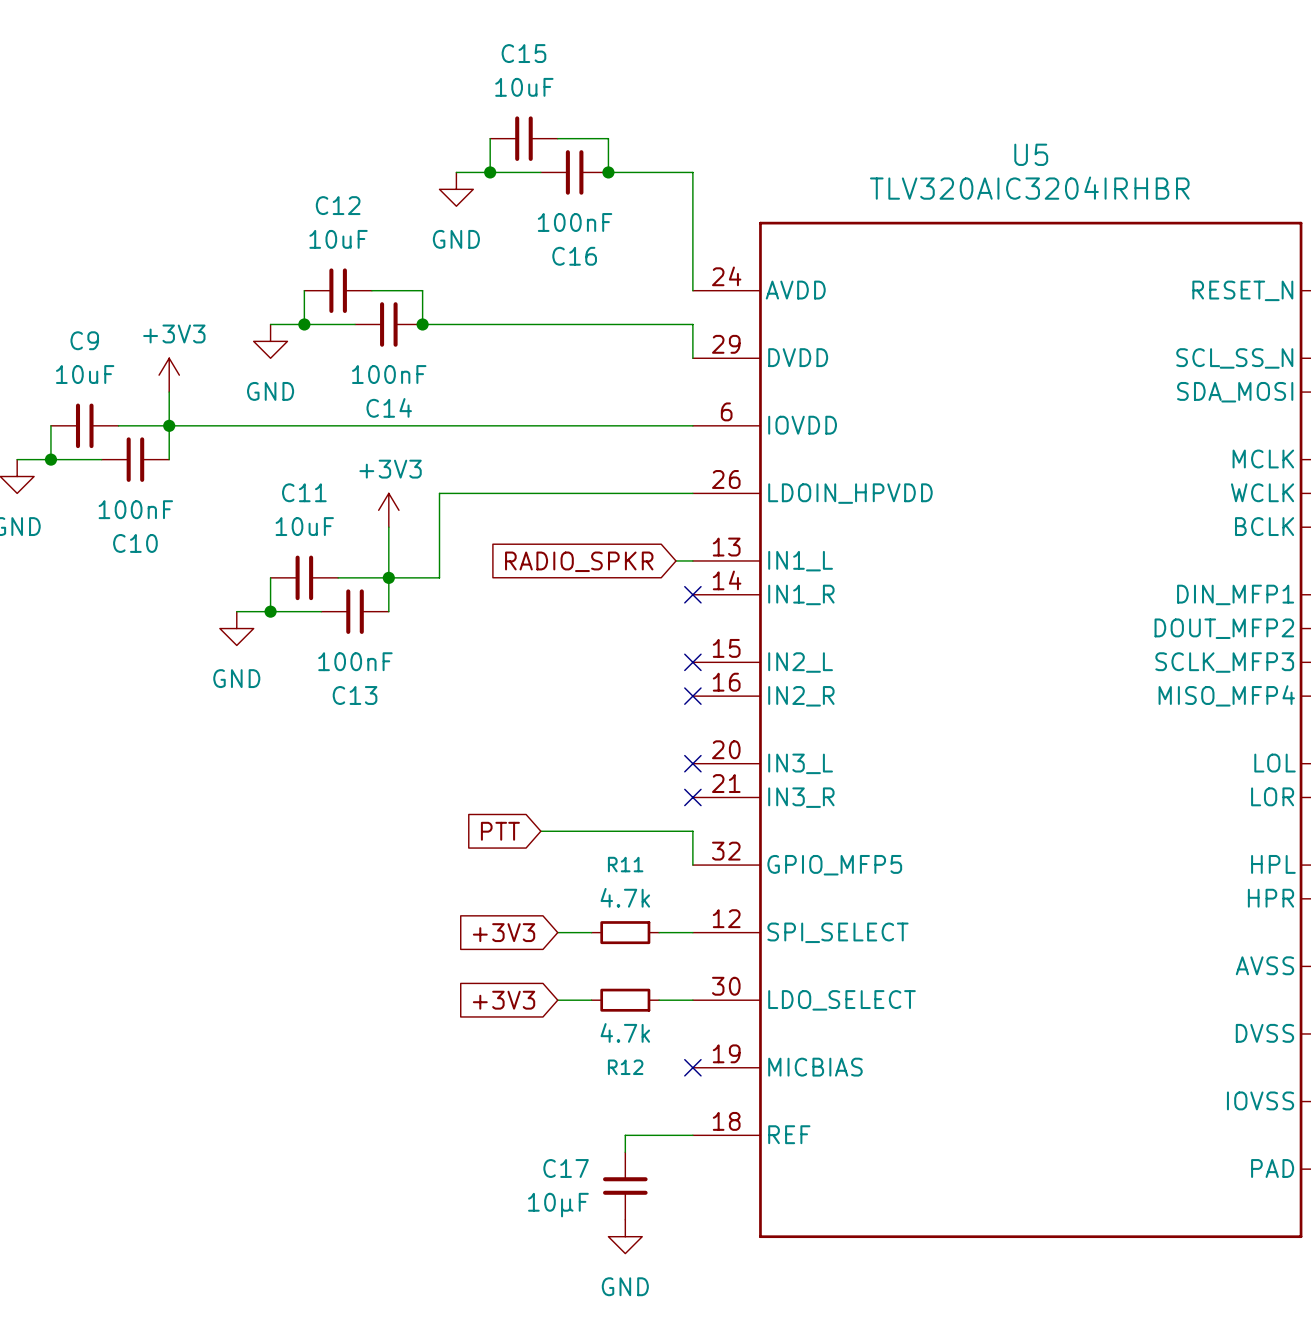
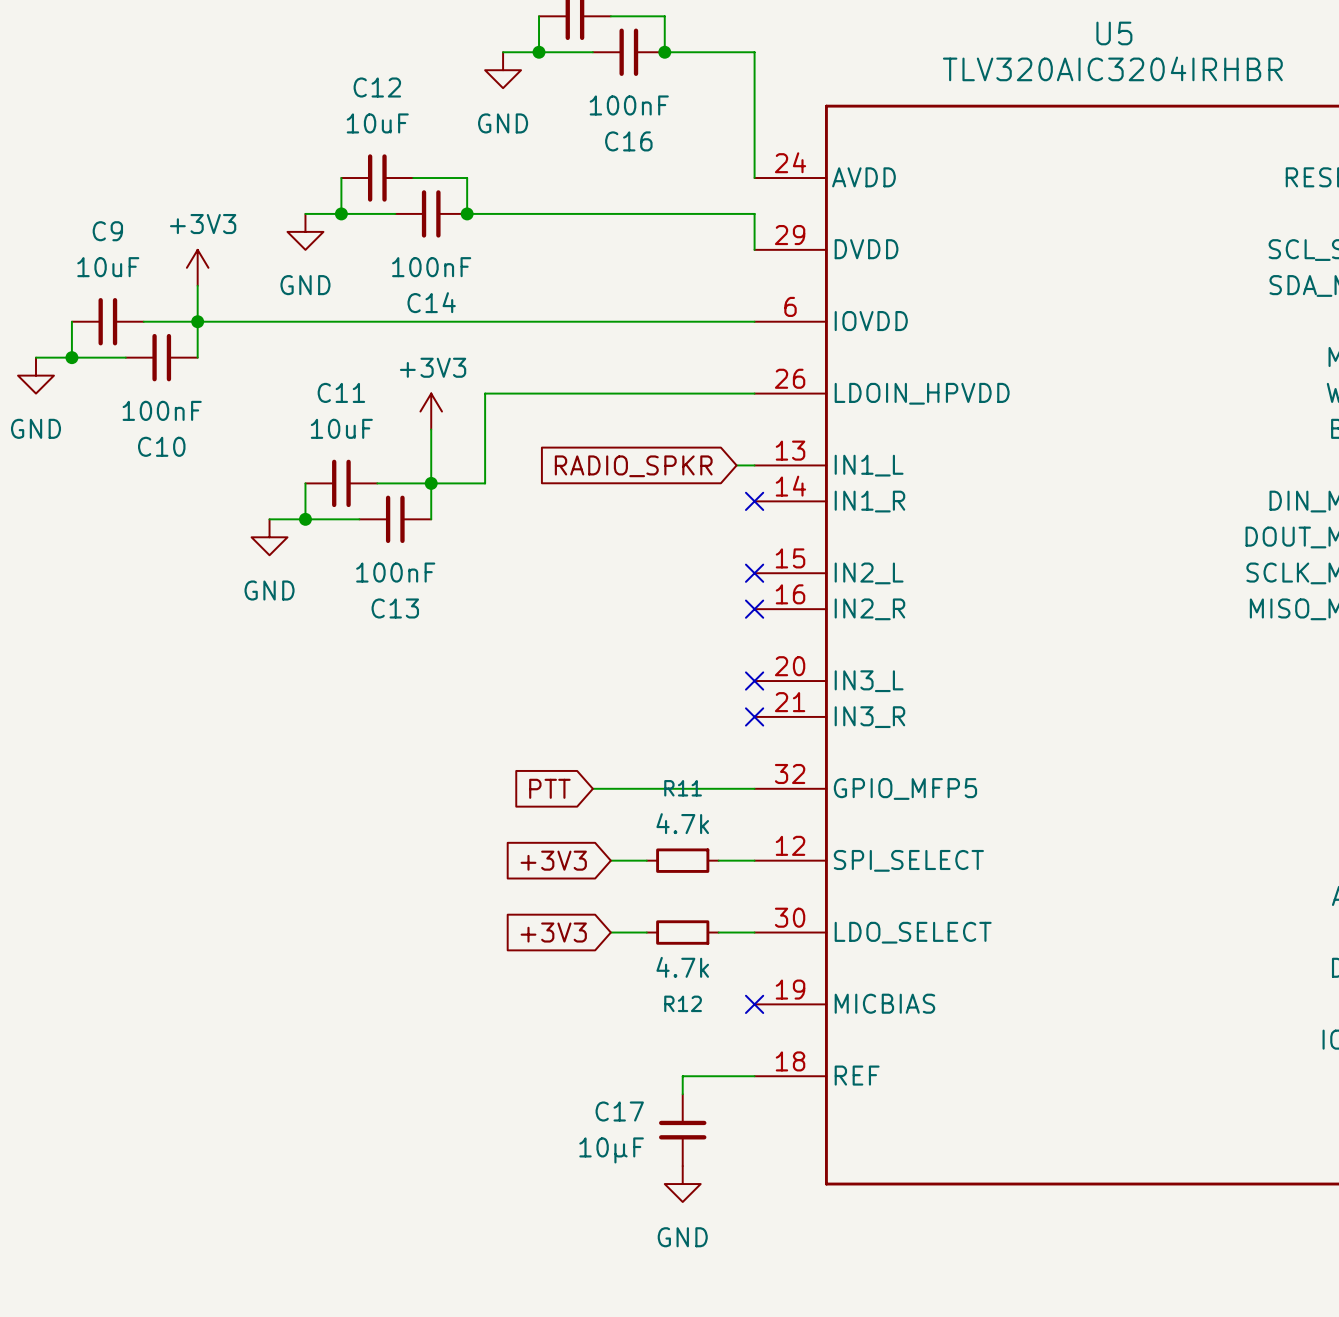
global label position: PTT (500, 831) -> PTT (549, 788)
wire: (540, 831) (692, 831) (692, 865) -> (592, 788) (754, 788)

